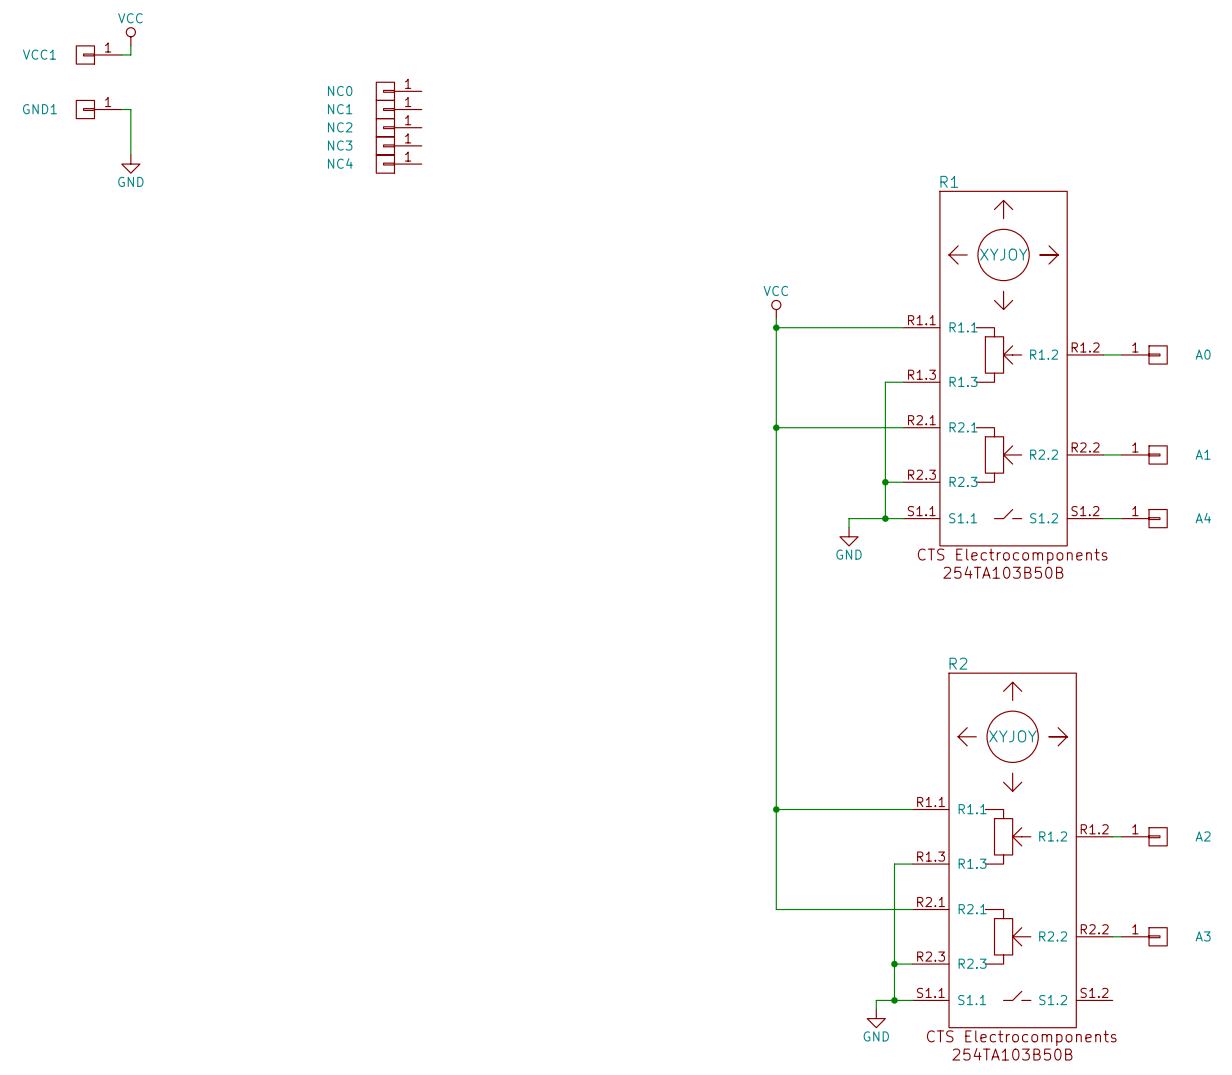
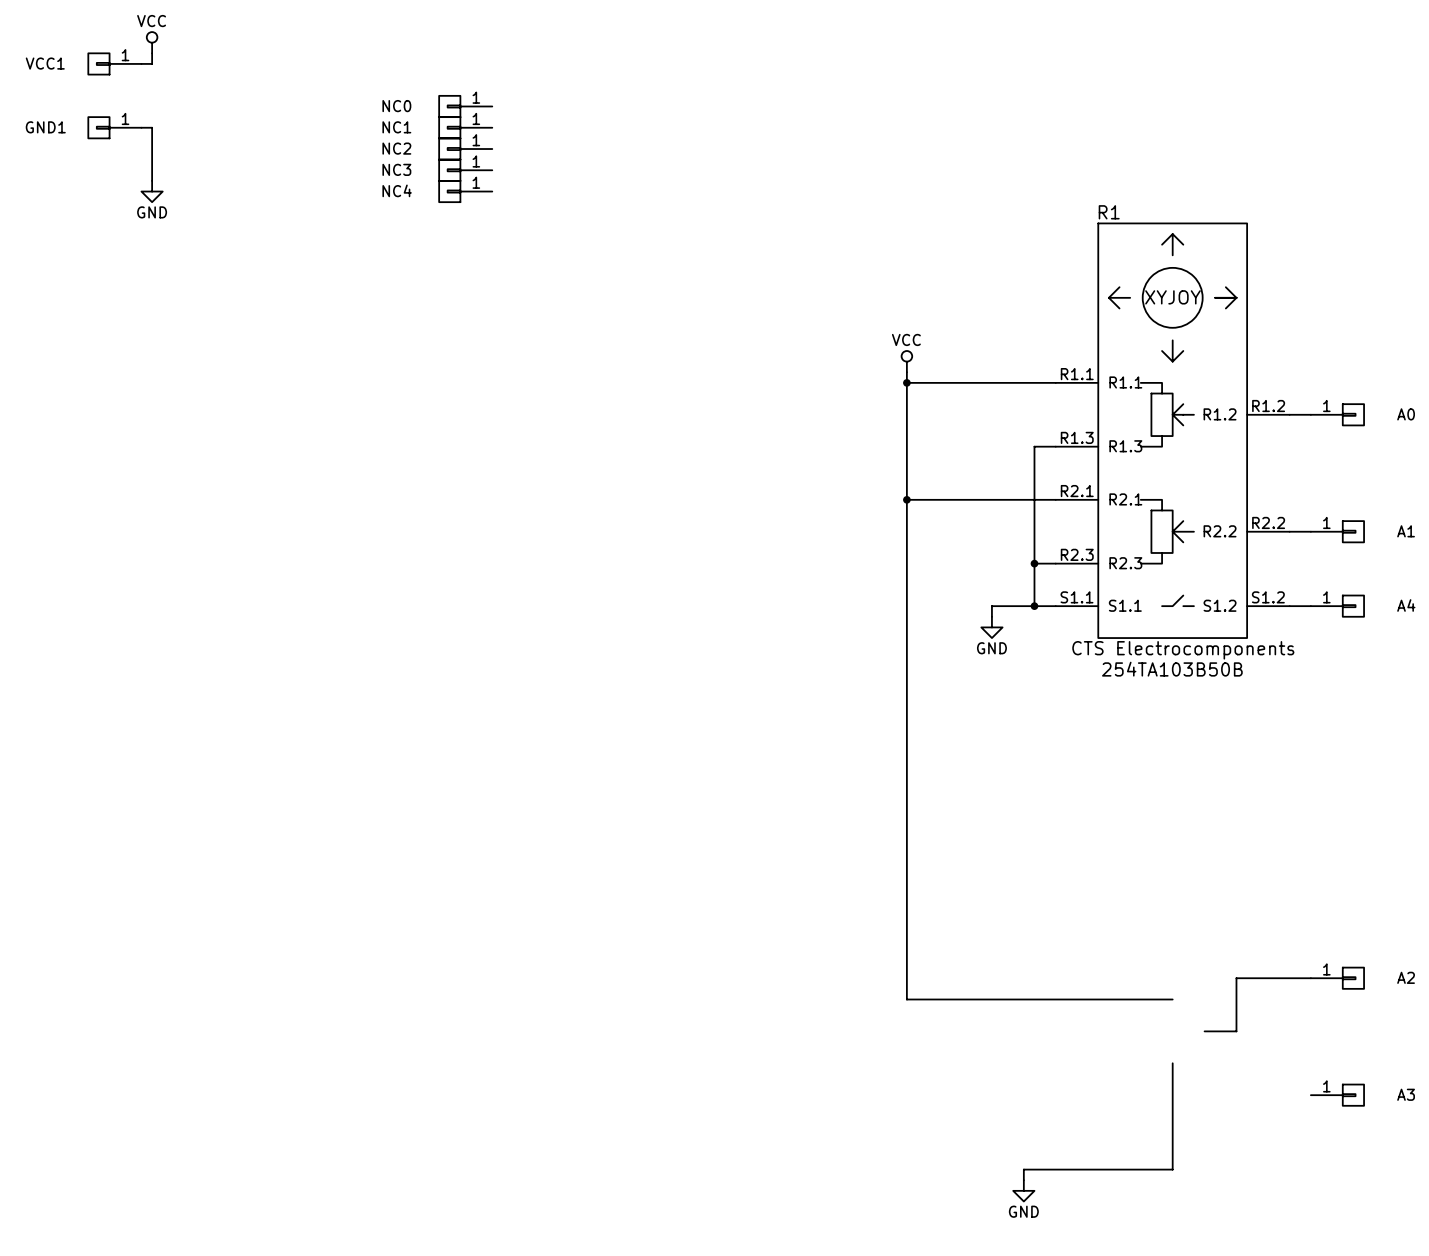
wire: (776, 809) (912, 809) -> none
junction: (776, 809) -> none
wire: none -> (1300, 978) (1236, 978) (1236, 1031) (1204, 1031)
R2: XYJOY (1012, 850) -> none
wire: (776, 854) (776, 909) (912, 909) -> (906, 999) (1172, 999)
wire: (912, 864) (894, 864) (894, 1000) -> none
wire: none -> (1172, 1063) (1172, 1169) (1066, 1169)
wire: (1112, 936) (1121, 936) -> none
wire: (894, 964) (912, 964) -> none
junction: (894, 964) -> none
junction: (894, 1000) -> none

